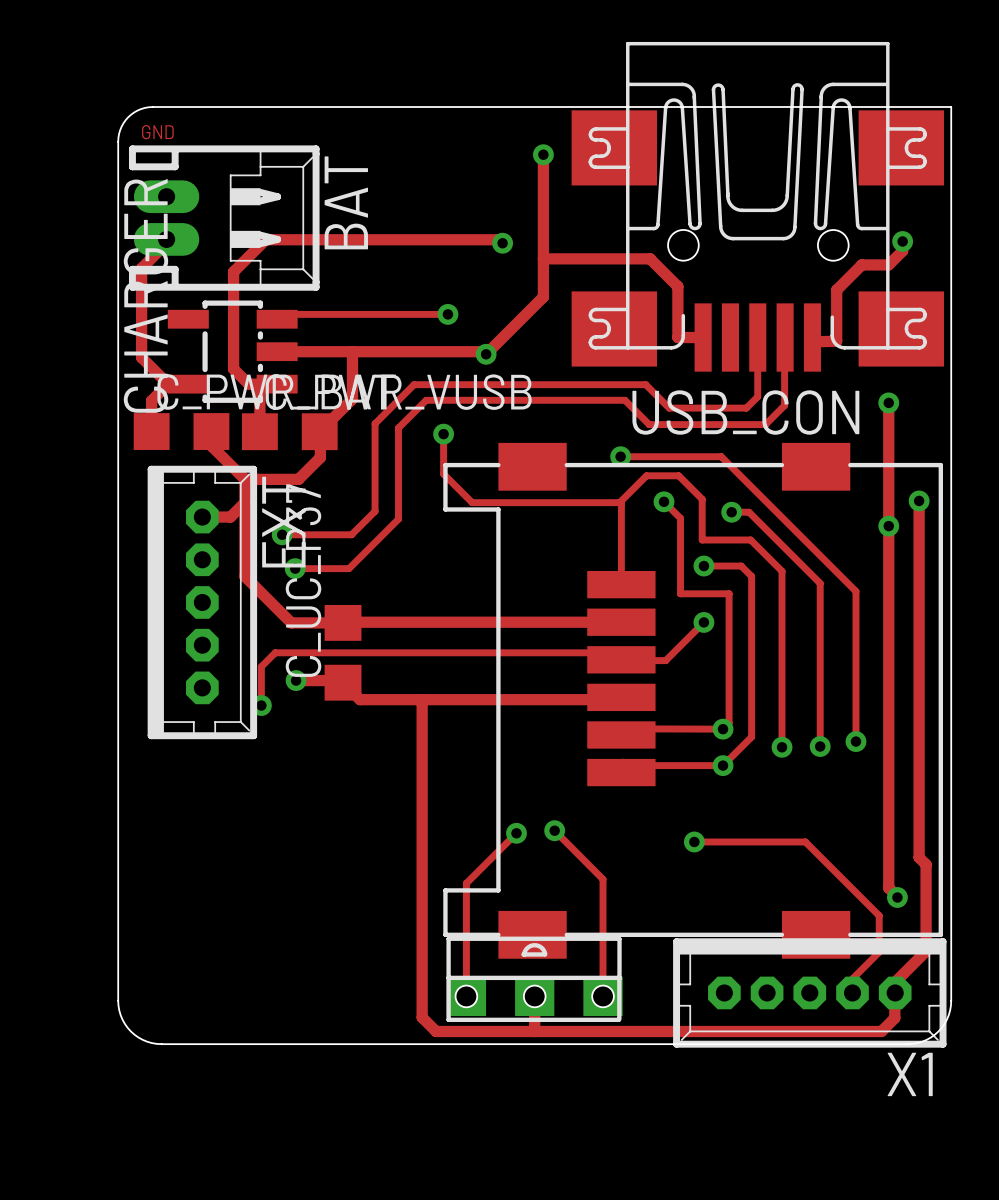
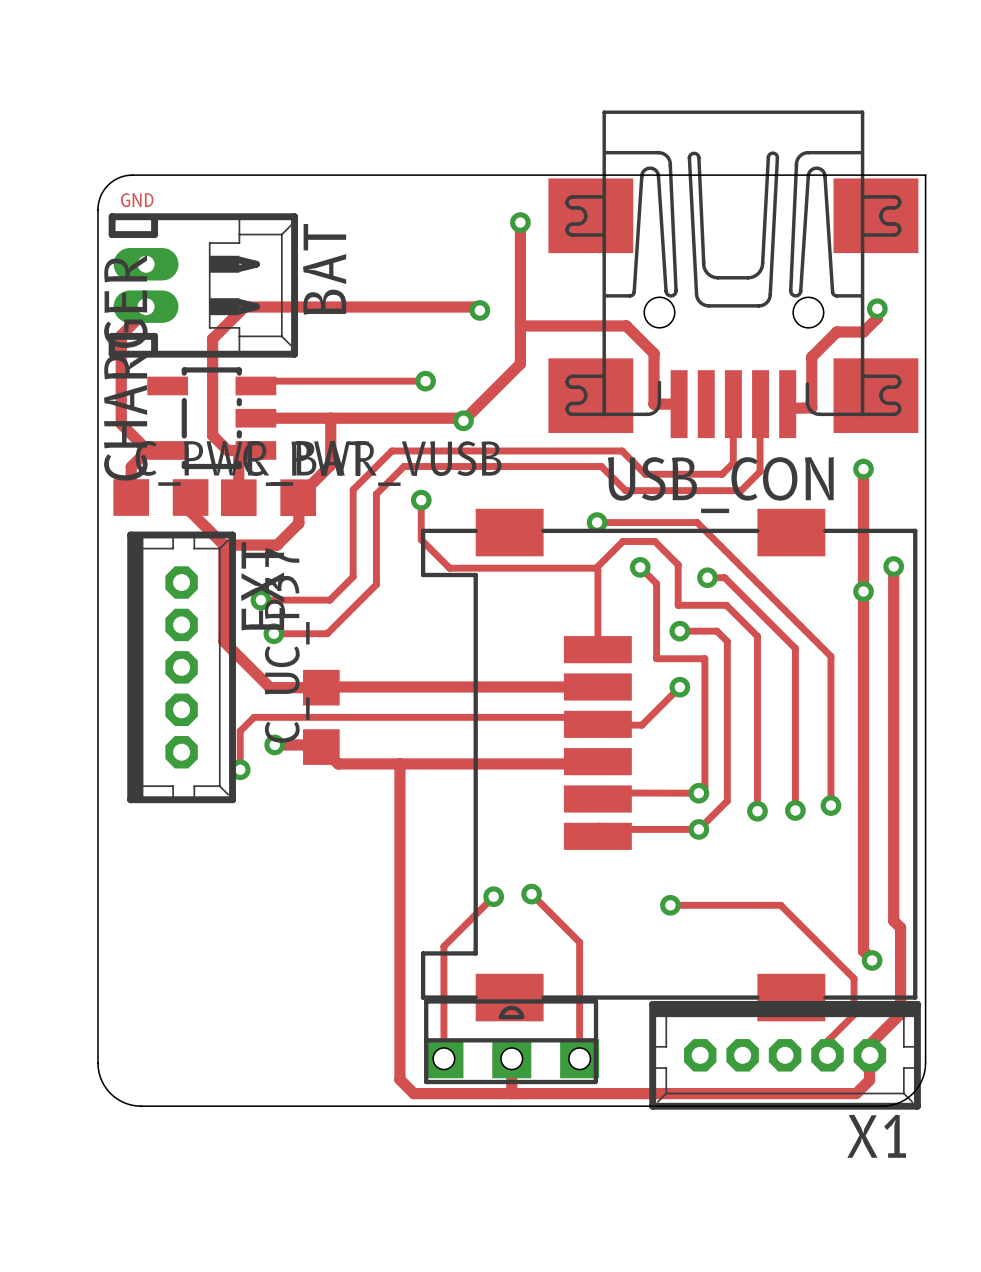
track: (244, 502) (230, 517) (202, 517) -> none

